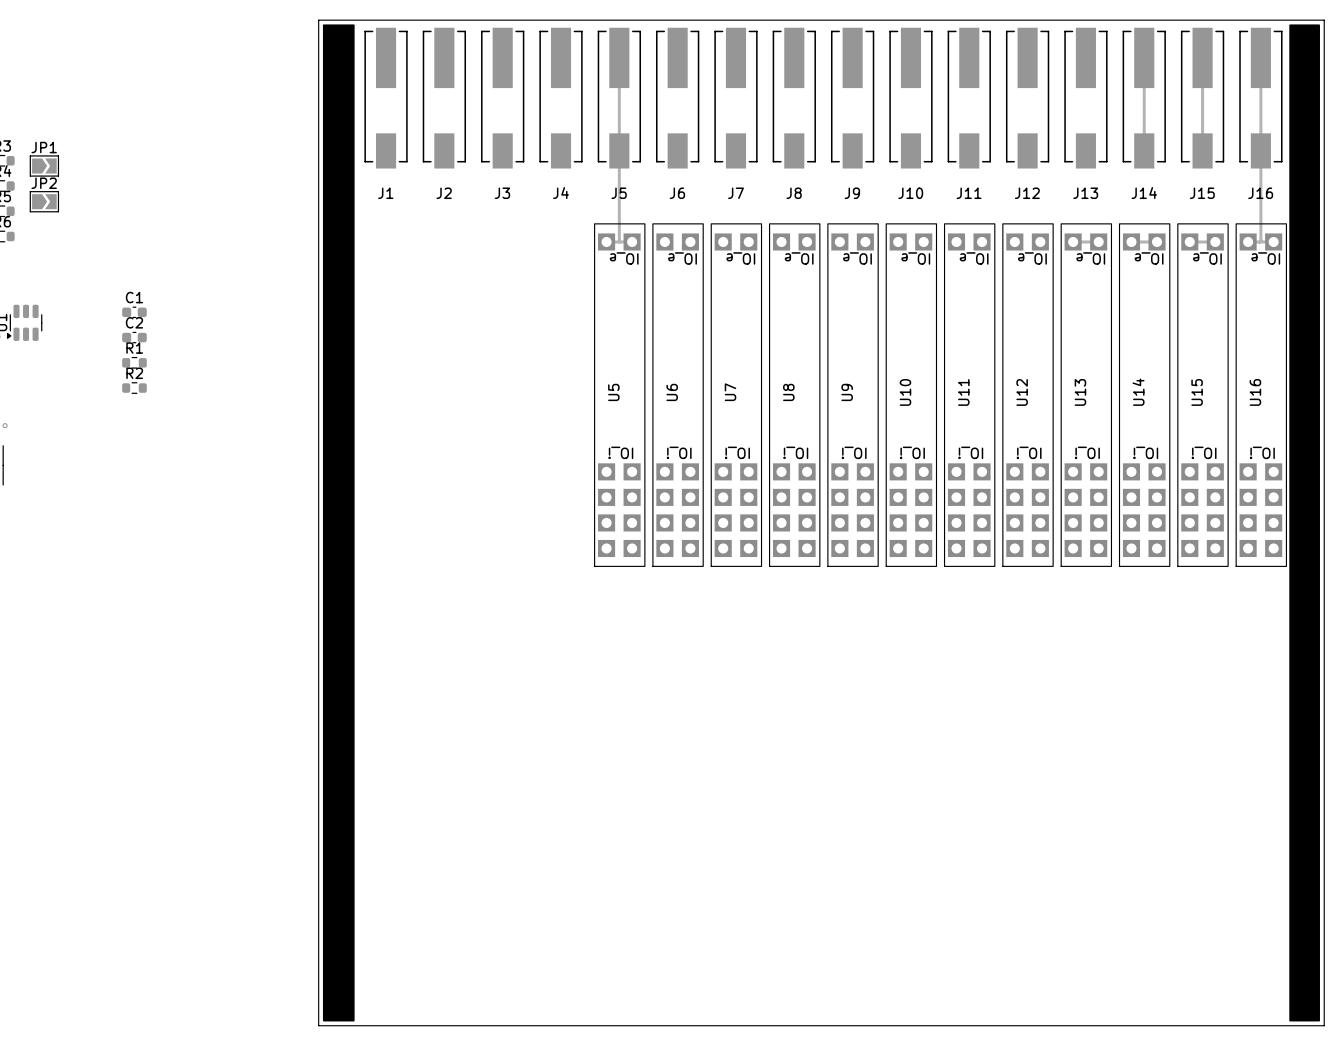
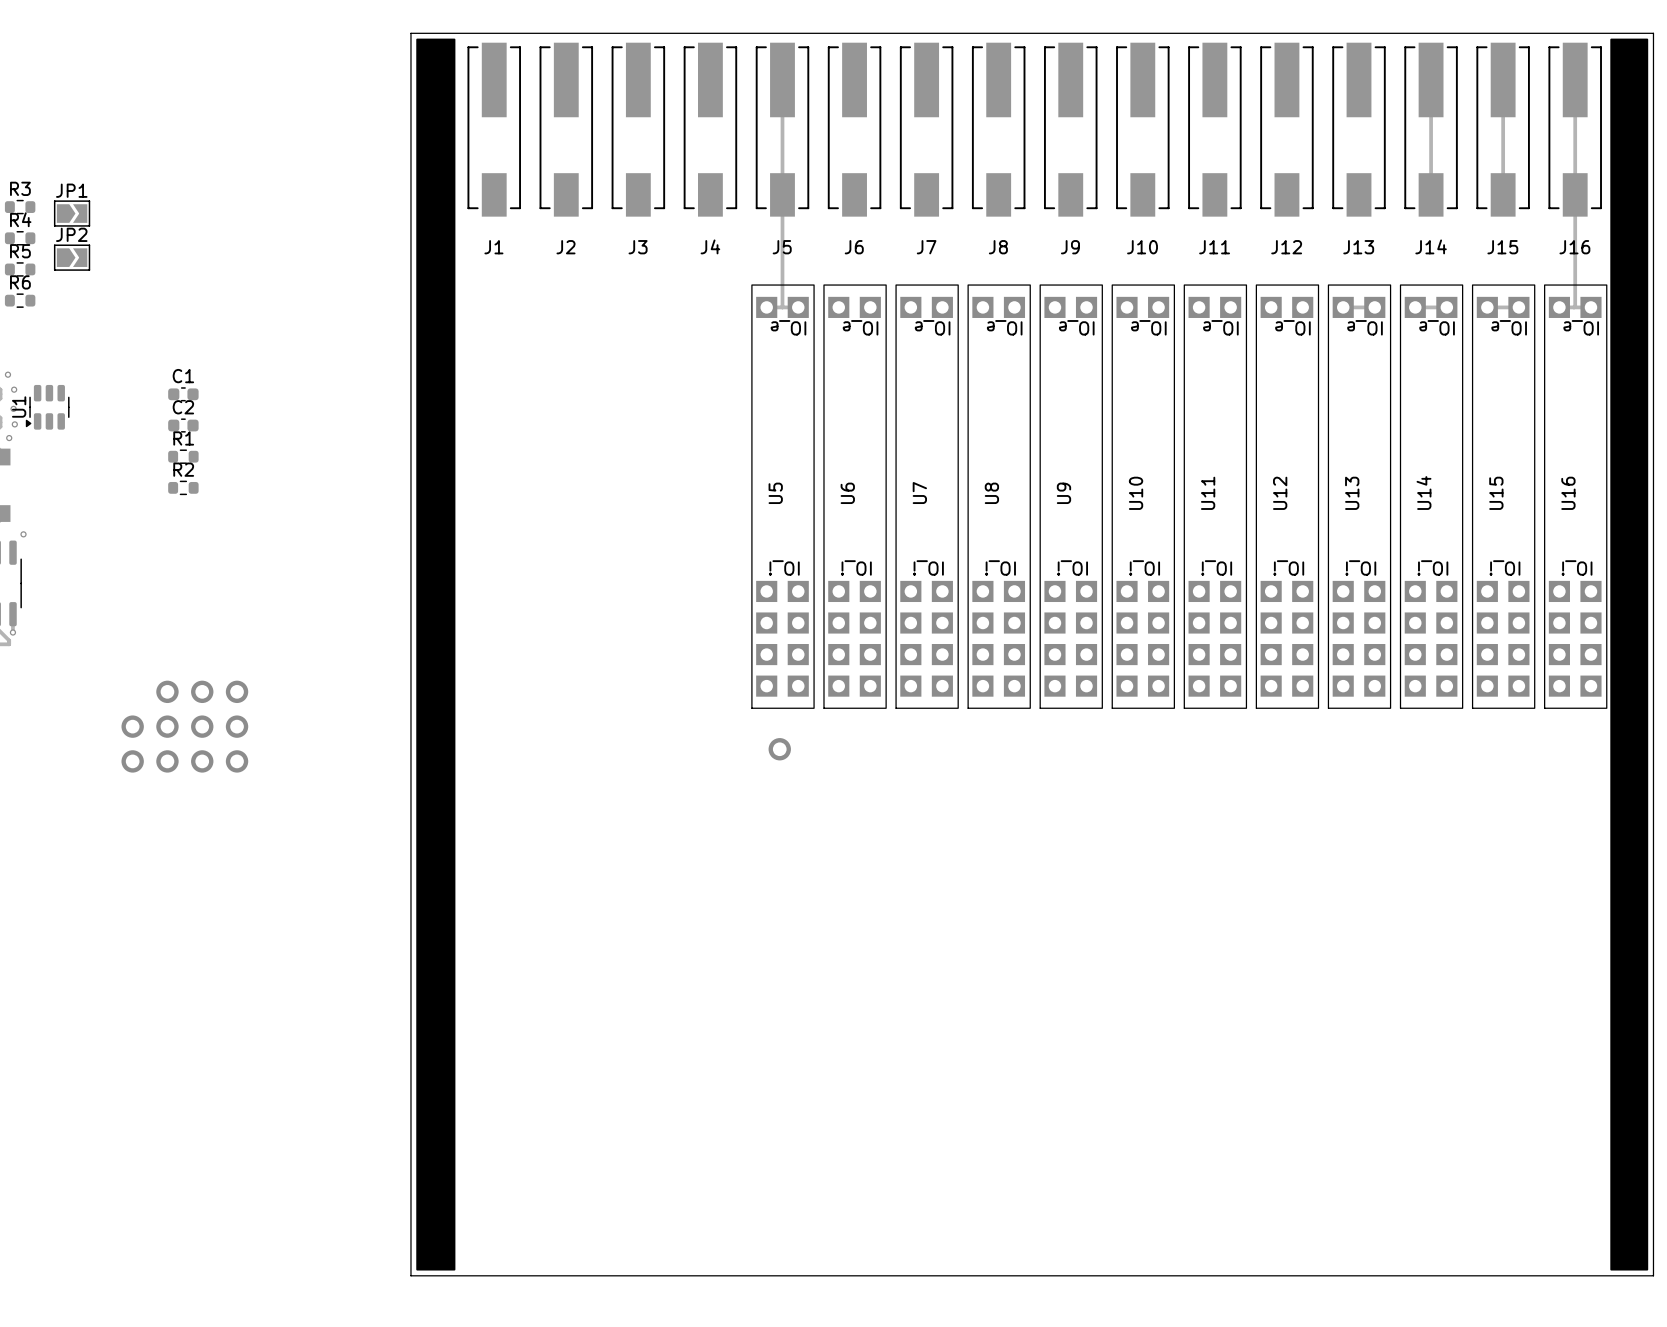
part: none -> (167, 691)
part: none -> (202, 691)
part: none -> (237, 691)
part: none -> (132, 726)
part: none -> (167, 726)
part: none -> (202, 726)
part: none -> (237, 726)
part: none -> (779, 749)
part: none -> (132, 761)
part: none -> (167, 761)
part: none -> (202, 761)
part: none -> (237, 761)

